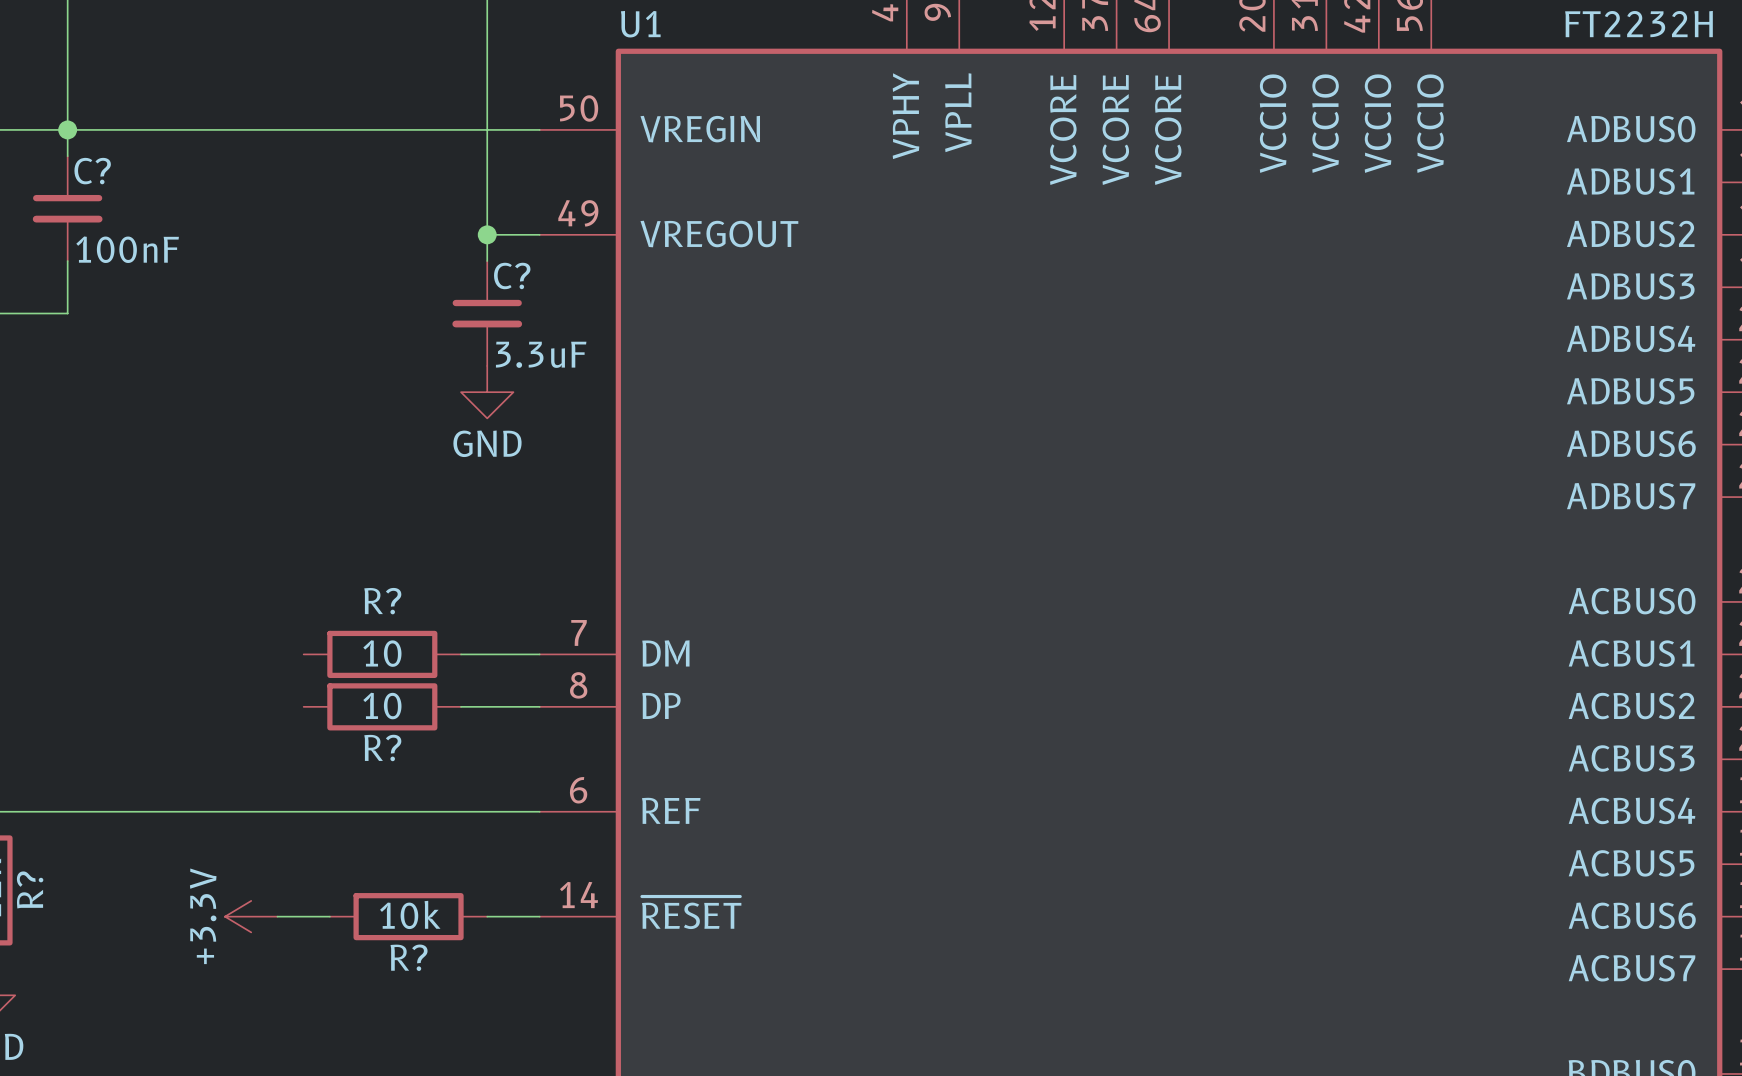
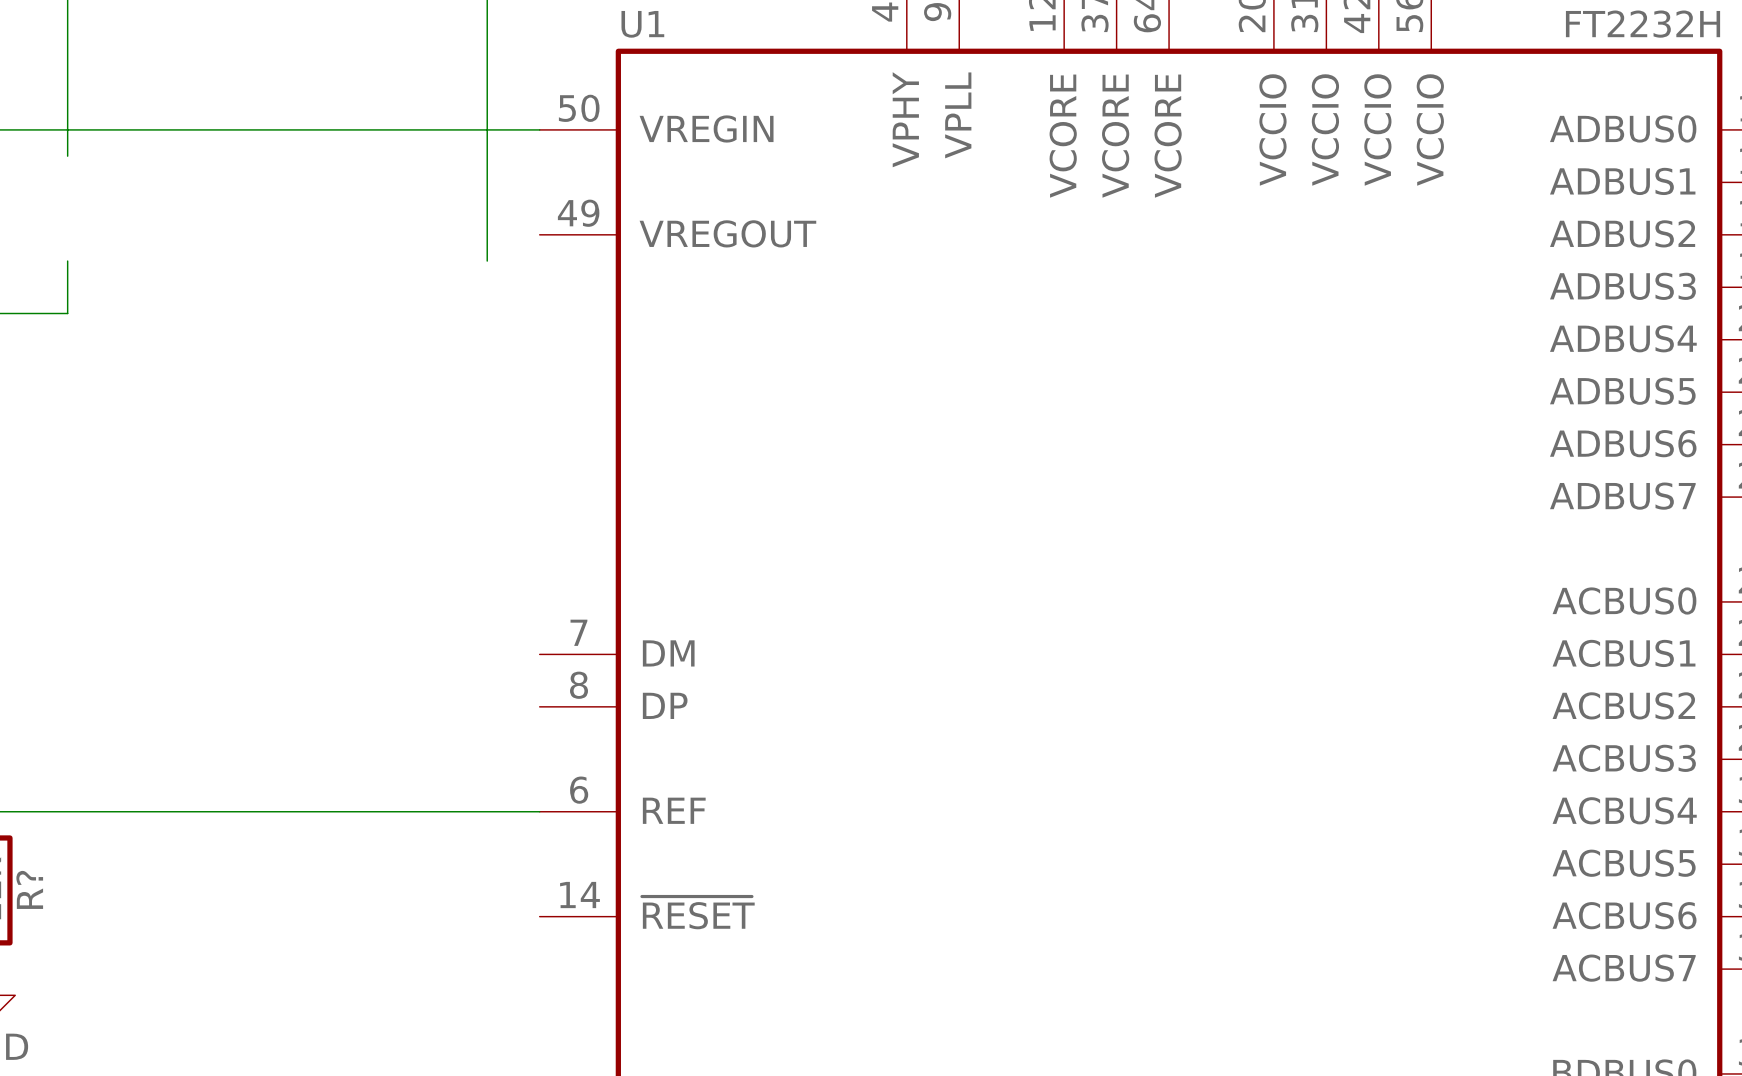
junction: (67, 129) -> none
C?: 100nF (67, 208) -> none
wire: (487, 234) (539, 234) -> none
junction: (487, 234) -> none
C?: 3.3uF (487, 313) -> none
power symbol: GND (487, 392) -> none
R?: 10 (382, 654) -> none
wire: (461, 654) (539, 654) -> none
R?: 10 (382, 706) -> none
wire: (461, 706) (539, 706) -> none
power symbol: +3.3V (251, 916) -> none
wire: (277, 916) (329, 916) -> none
R?: 10k (408, 916) -> none
wire: (487, 916) (539, 916) -> none

